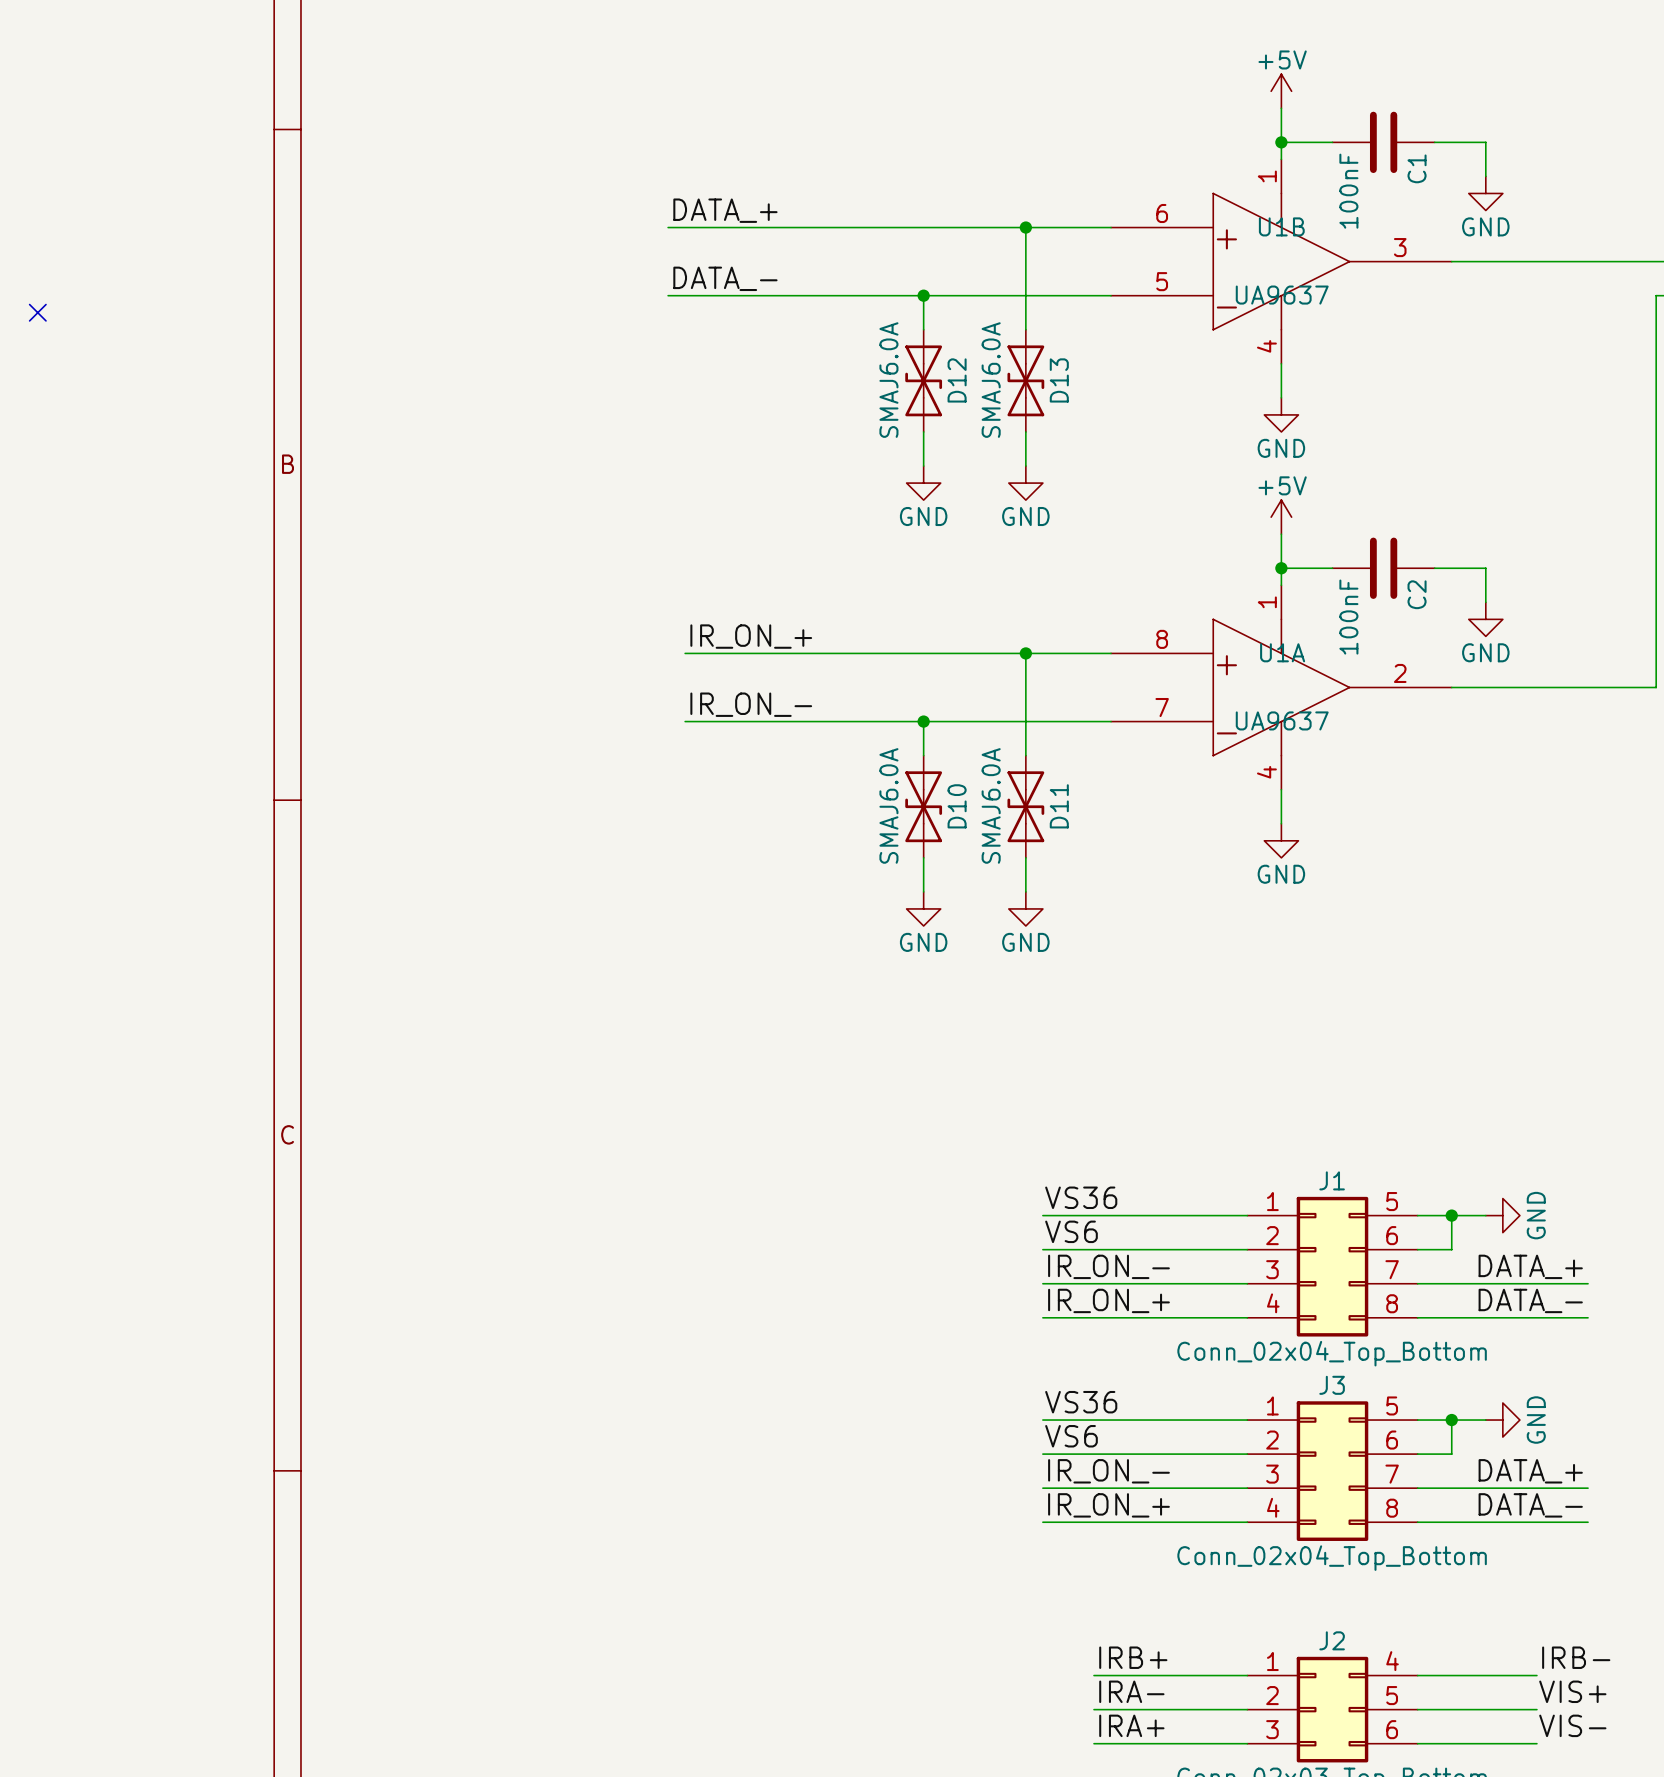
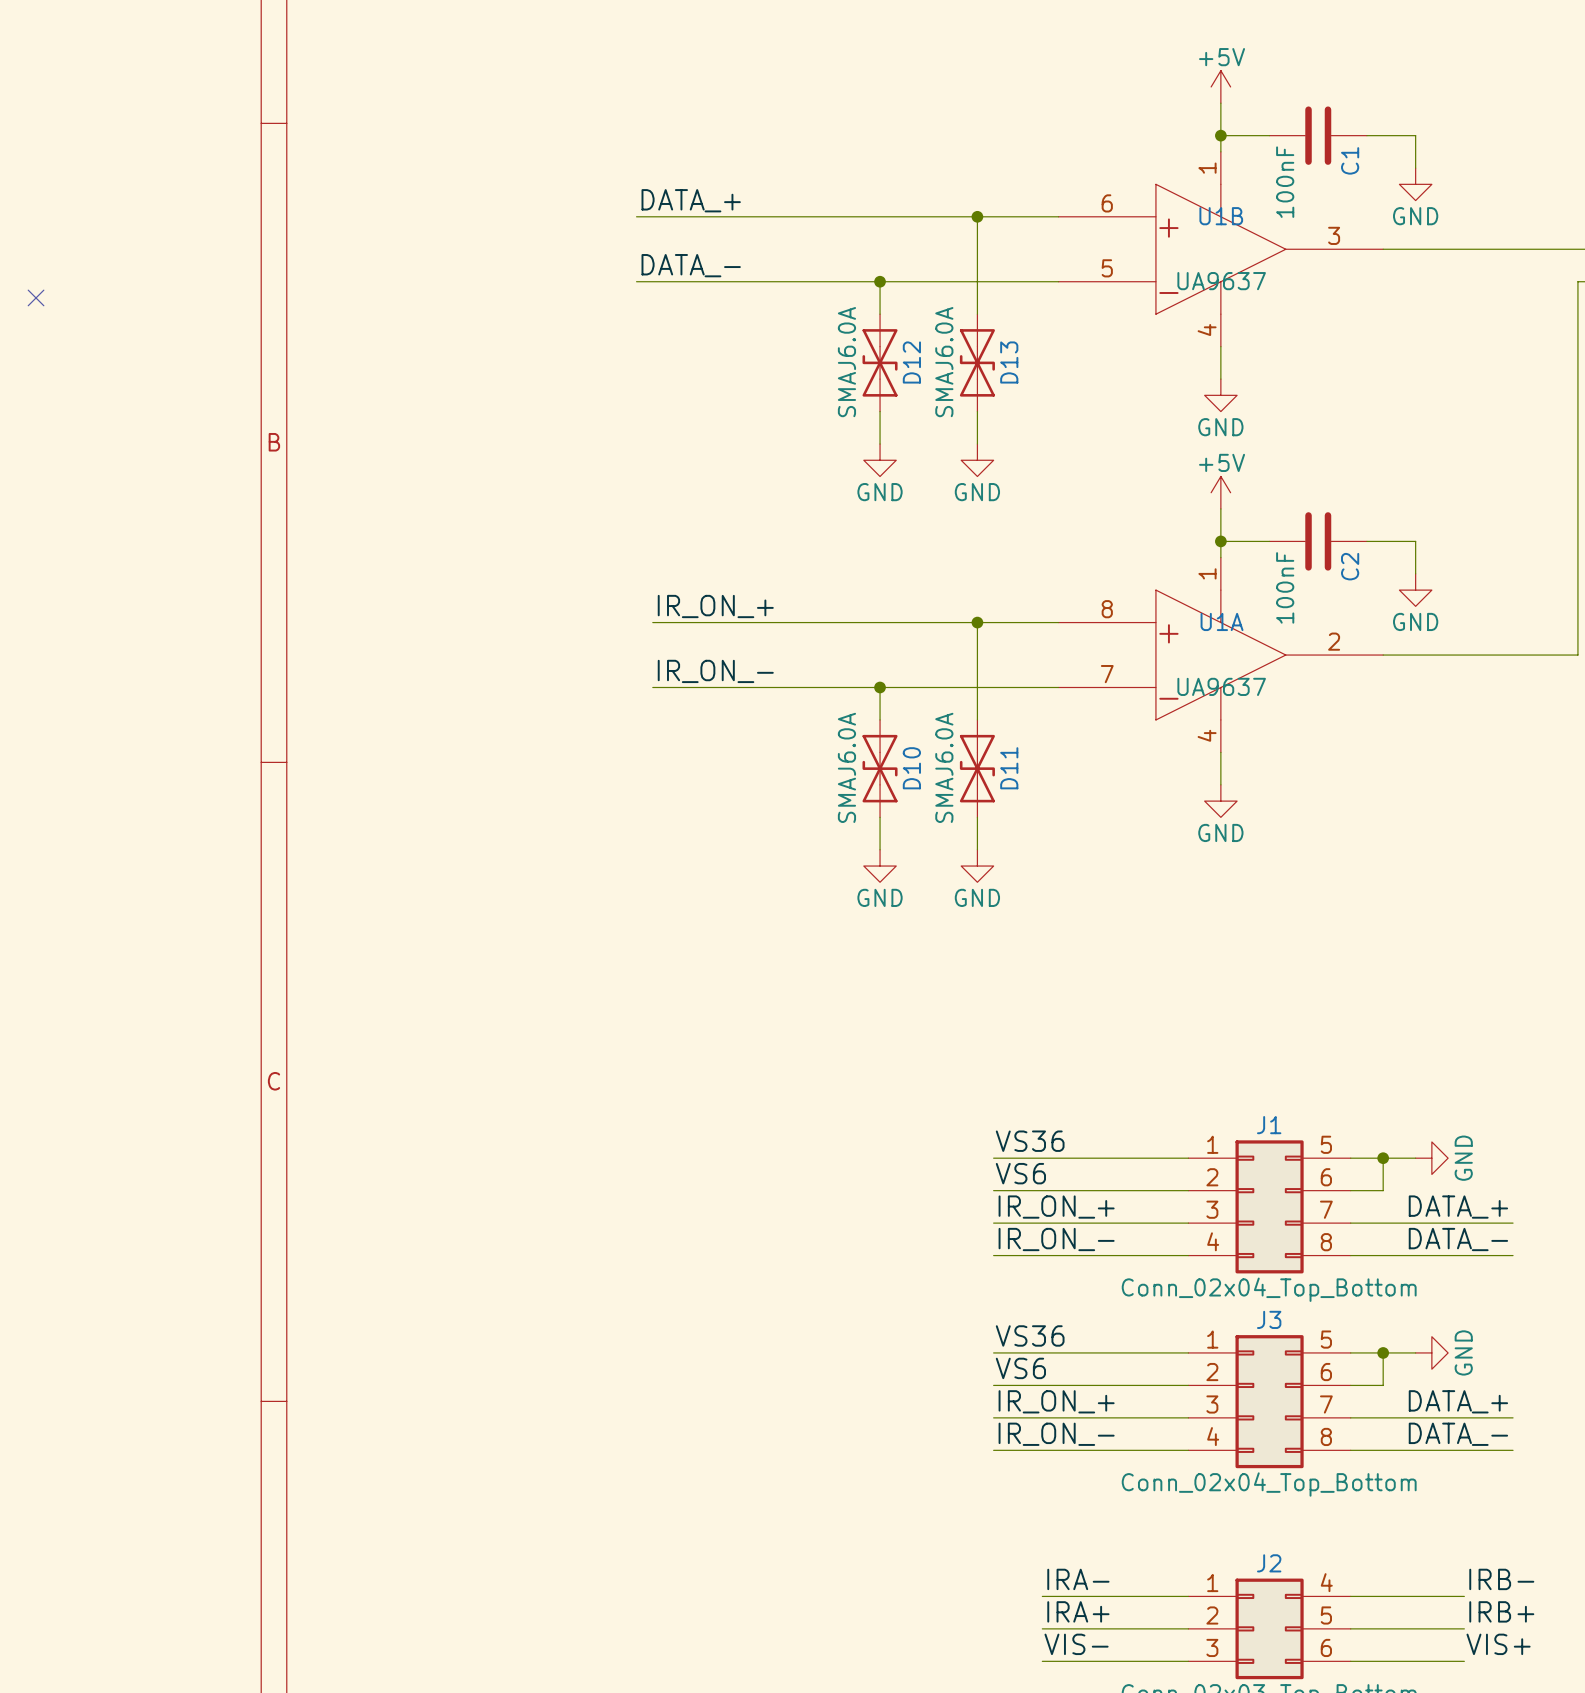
label: IR_ON_- (1108, 1266) -> IR_ON_+ (1056, 1207)
label: IR_ON_+ (1108, 1300) -> IR_ON_- (1056, 1239)
label: IR_ON_- (1108, 1471) -> IR_ON_+ (1056, 1401)
label: IR_ON_+ (1108, 1505) -> IR_ON_- (1056, 1434)
label: IRB+ (1133, 1657) -> IRA- (1078, 1579)
label: IRA- (1131, 1691) -> IRA+ (1078, 1611)
label: VIS+ (1572, 1691) -> IRB+ (1501, 1611)
label: IRA+ (1131, 1725) -> VIS- (1076, 1644)
label: VIS- (1572, 1725) -> VIS+ (1498, 1644)

